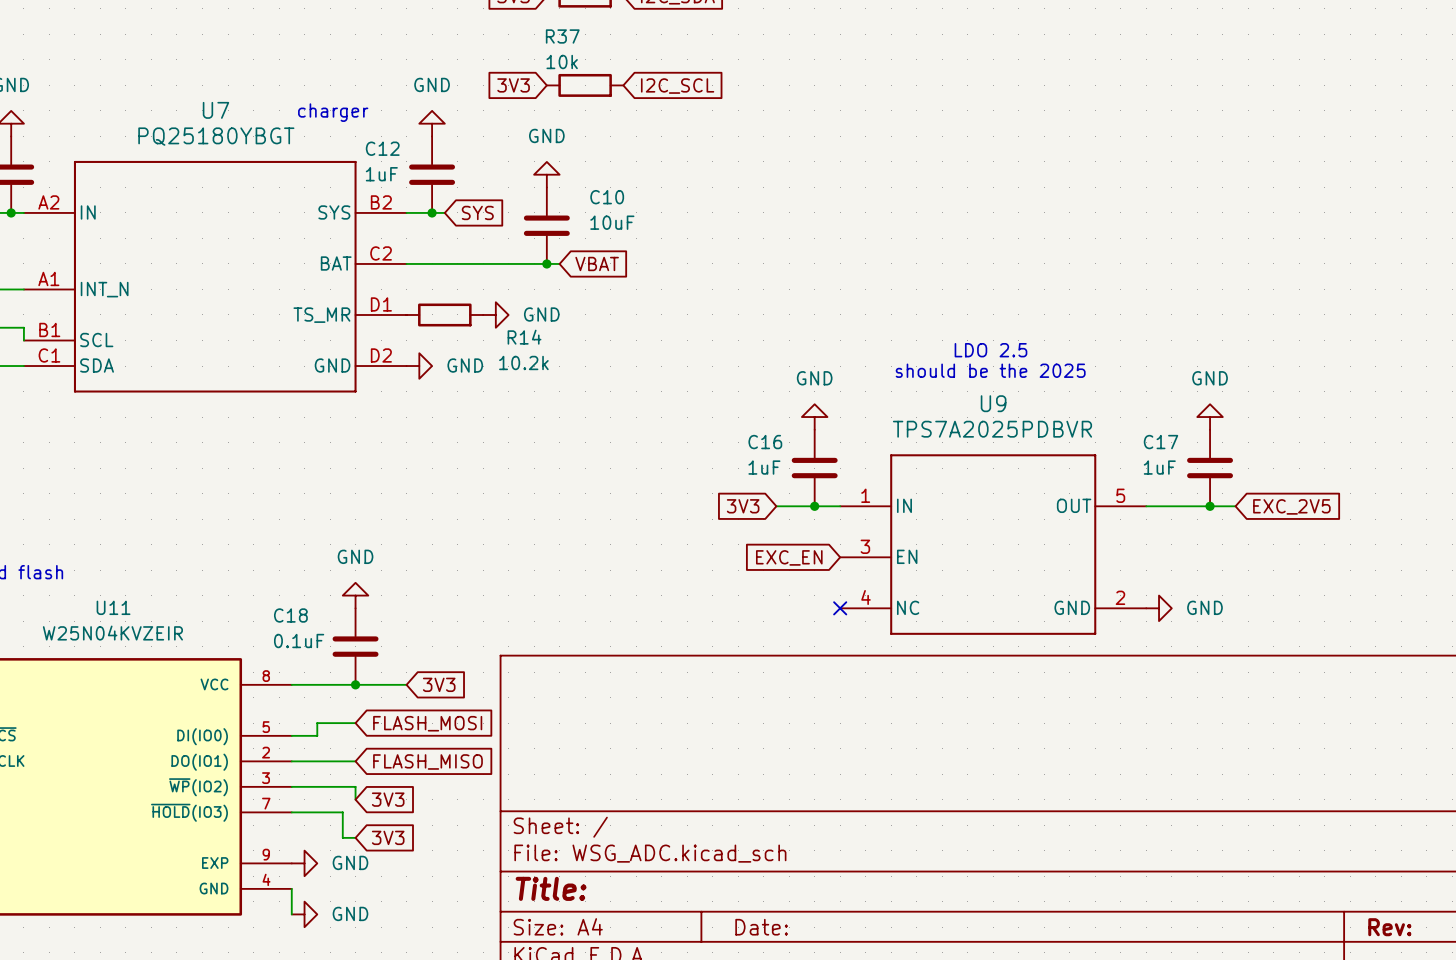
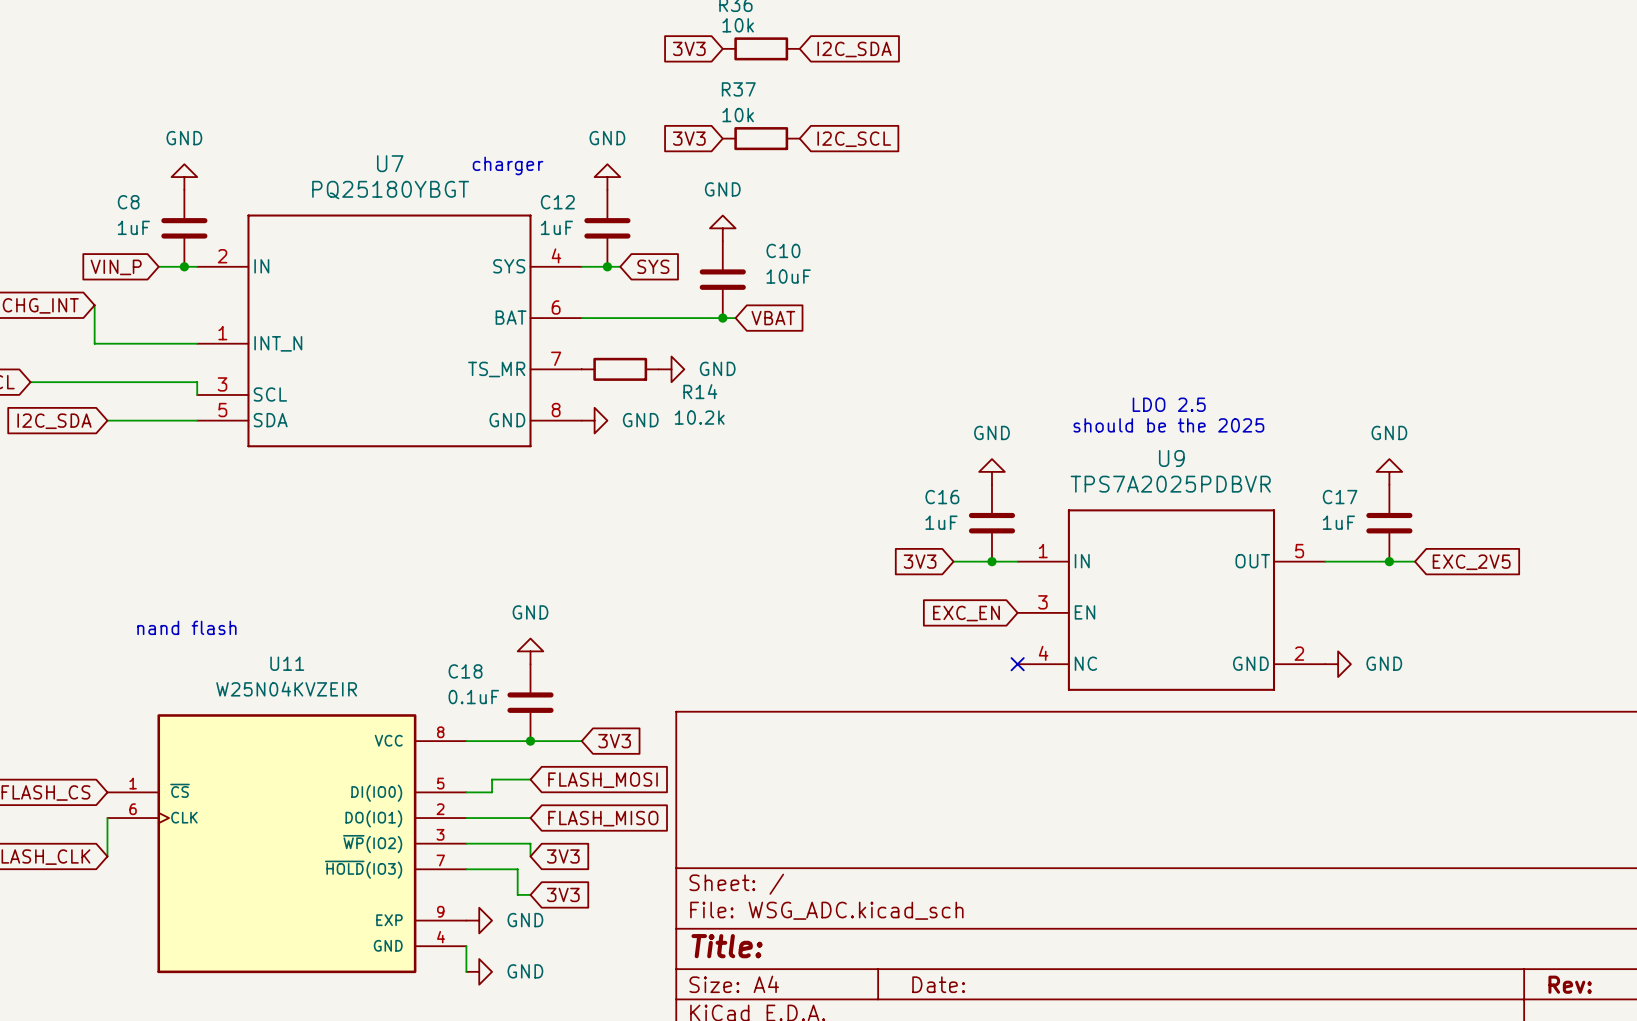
U7 pin number: A2 (48, 202) -> 2 (222, 256)
U7 pin number: B2 (381, 202) -> 4 (556, 255)
U7 pin number: C2 (381, 253) -> 6 (556, 307)
U7 pin number: A1 (48, 278) -> 1 (222, 333)
U7 pin number: D1 (381, 304) -> 7 (556, 358)
U7 pin number: B1 (49, 329) -> 3 (222, 384)
U7 pin number: C1 (49, 355) -> 5 (222, 410)
U7 pin number: D2 (381, 355) -> 8 (556, 410)

